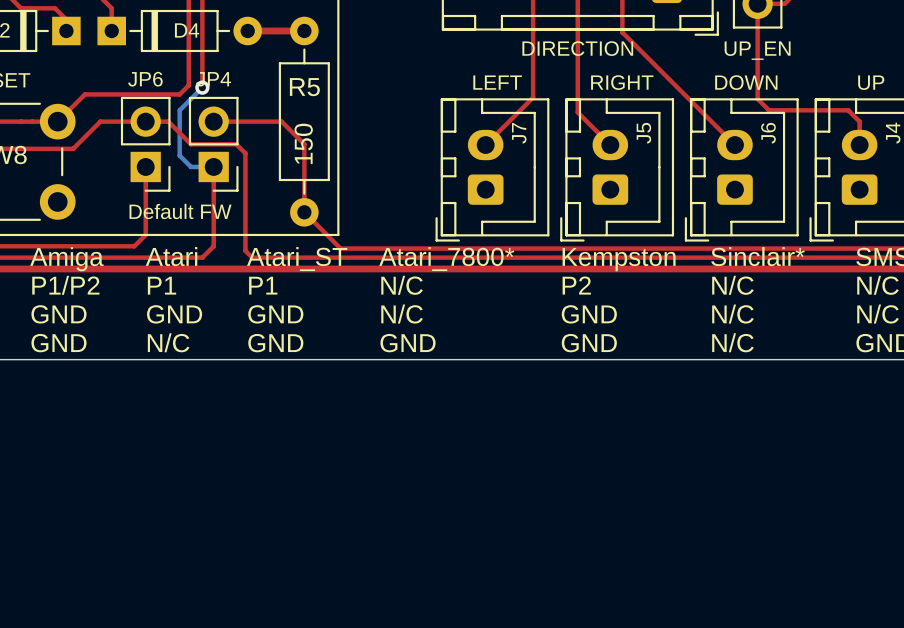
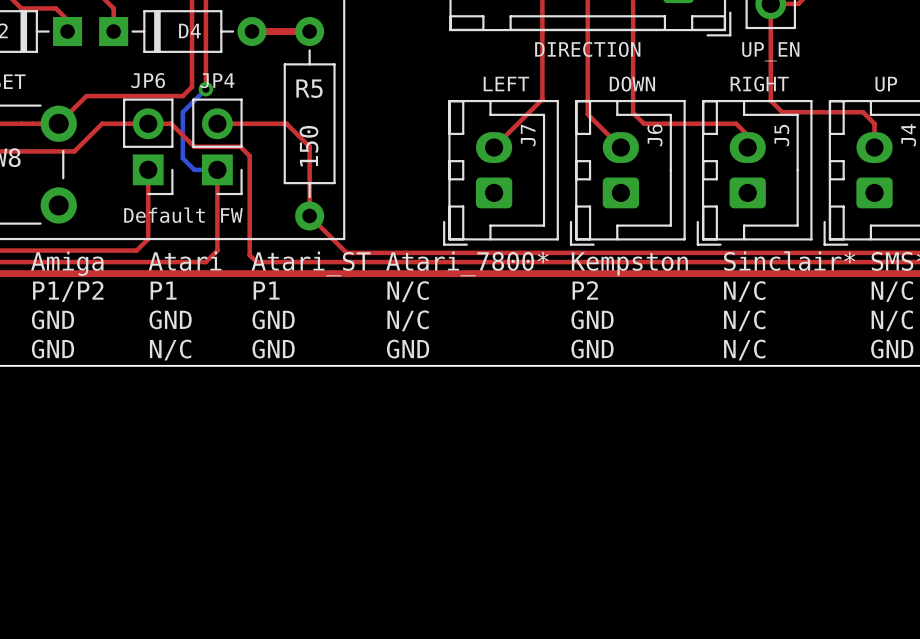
top track: (622, 32) (734, 145) -> (633, 32) (633, 112) (643, 123) (736, 123) (747, 135) (747, 147)
J5 value: RIGHT (622, 82) -> DOWN (632, 84)
J6 value: DOWN (746, 82) -> RIGHT (759, 84)
J5 name: J5 (643, 133) -> J6 (654, 135)
J6 name: J6 (768, 133) -> J5 (781, 135)

